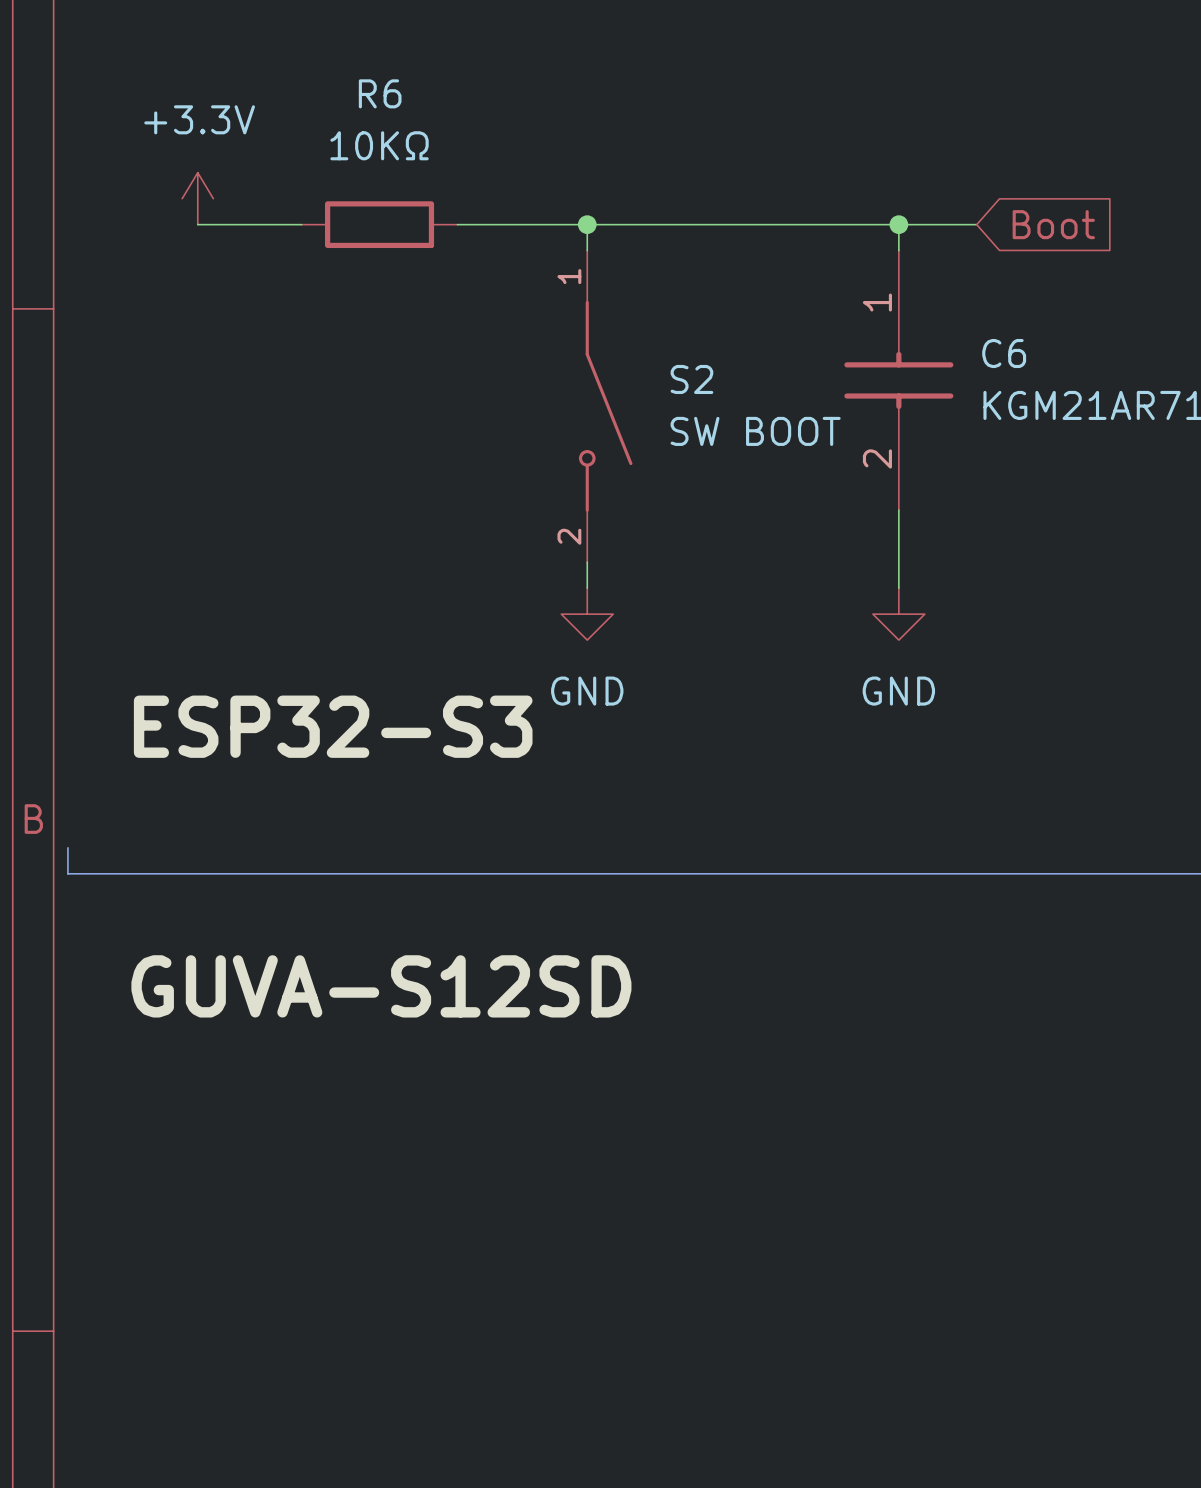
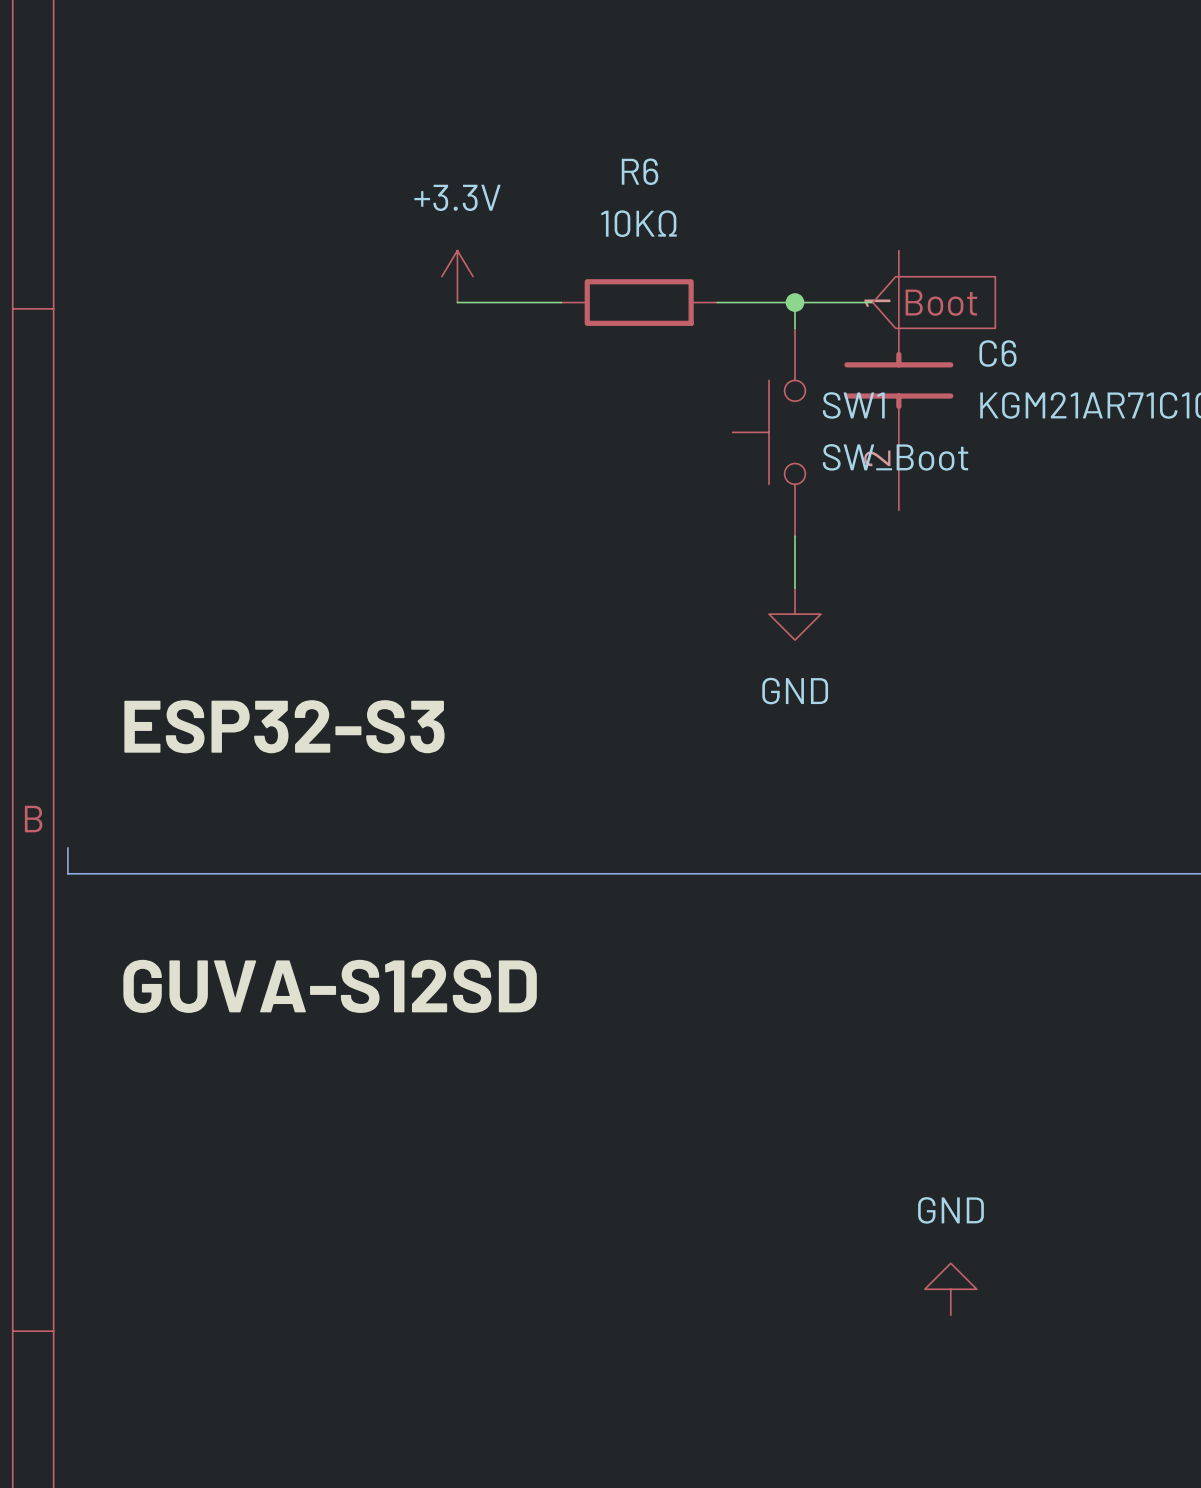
power symbol position: +3.3V (197, 198) -> +3.3V (457, 276)
wire: (197, 224) (301, 224) -> (457, 302) (561, 302)
R6 position: (379, 224) -> (639, 302)
wire: (457, 224) (976, 224) -> none
wire: (587, 224) (587, 250) -> none
junction: (587, 224) -> none
wire: (898, 224) (898, 250) -> (794, 302) (794, 328)
junction: (898, 224) -> none
global label position: Boot (1053, 224) -> Boot (941, 302)
wire: none -> (717, 302) (872, 302)
junction: none -> (794, 302)
S2: SW BOOT (605, 406) -> none
SW1: none -> SW_Boot (769, 432)
wire: (898, 510) (898, 588) -> none
wire: none -> (794, 536) (794, 588)
wire: (587, 562) (587, 588) -> none
power symbol: GND (587, 614) -> none
power symbol: none -> GND (794, 614)
power symbol: GND (898, 614) -> none
power symbol: none -> GND (950, 1289)

